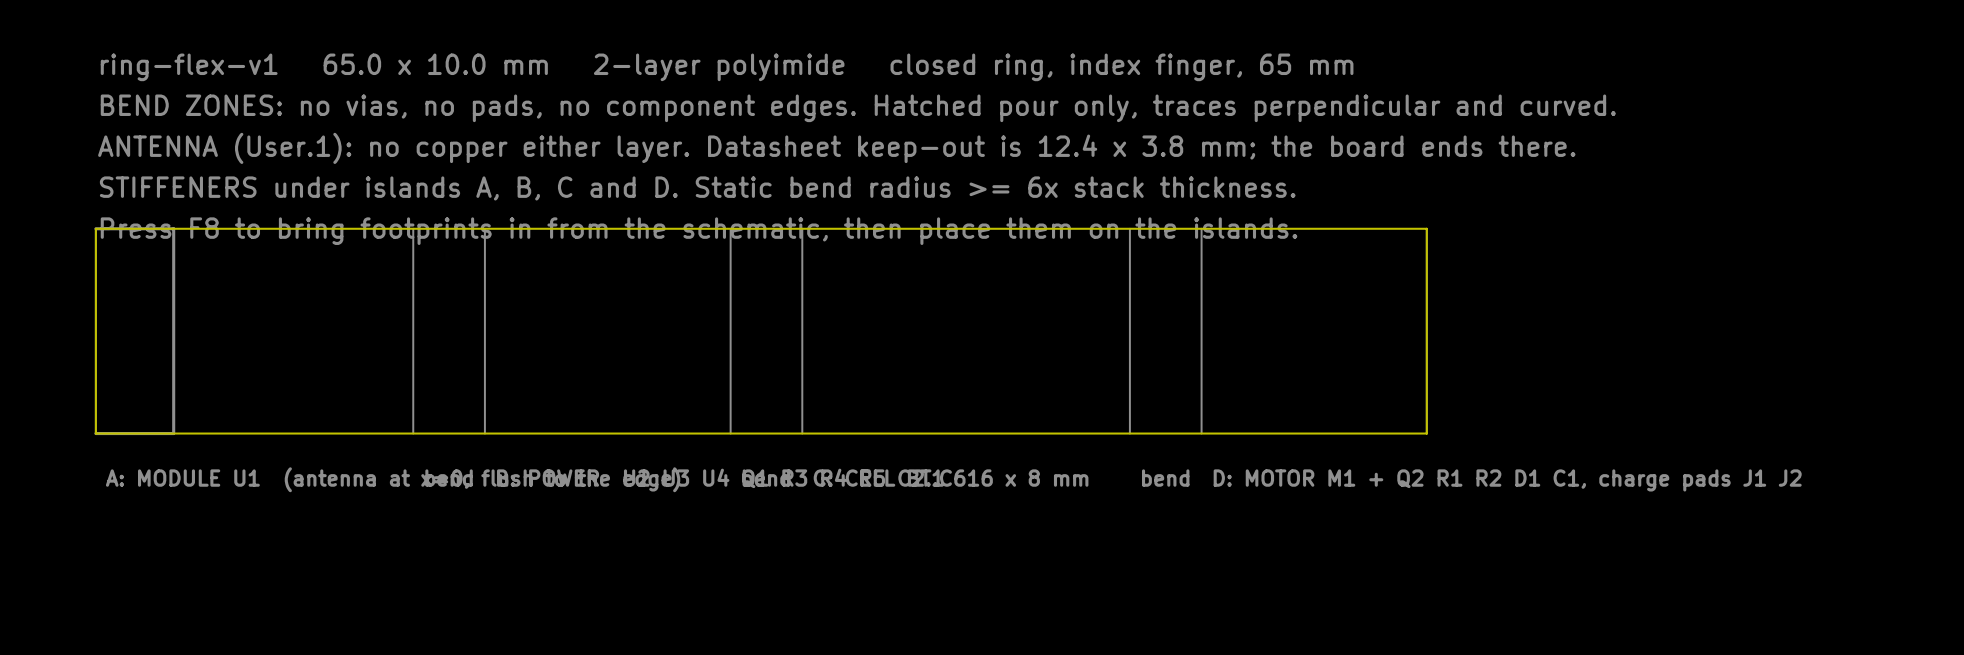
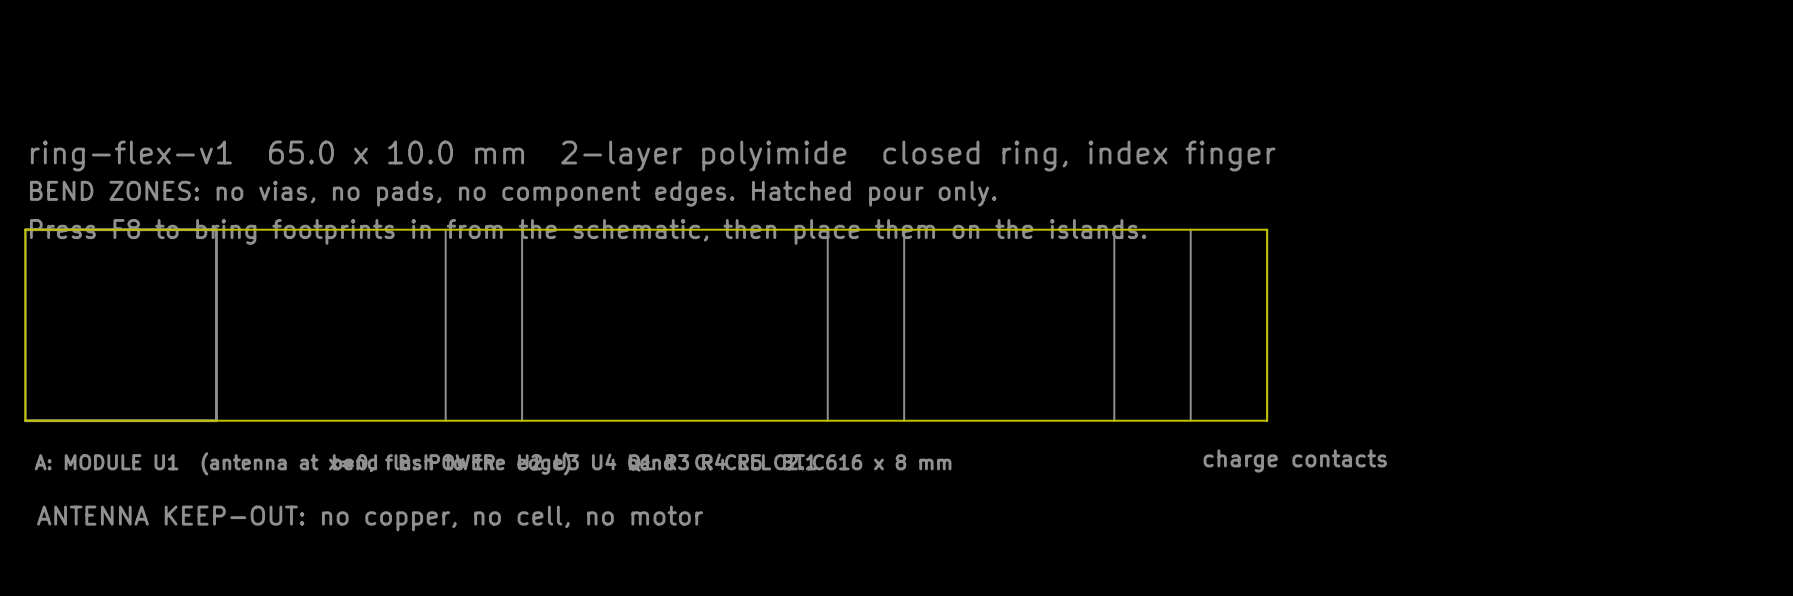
text: ring-flex-v1 65.0 x 10.0 mm 2-layer polyimide closed ring, index finger, 65 mm (727, 67) -> none
text: BEND ZONES: no vias, no pads, no component edges. Hatched pour only, traces perpendicular and curved. (858, 108) -> none
text: ANTENNA (User.1): no copper either layer. Datasheet keep-out is 12.4 x 3.8 mm; the board ends there. (836, 148) -> ring-flex-v1 65.0 x 10.0 mm 2-layer polyimide closed ring, index finger (653, 156)
text: STIFFENERS under islands A, B, C and D. Static bend radius >= 6x stack thickness. (697, 188) -> BEND ZONES: no vias, no pads, no component edges. Hatched pour only. (513, 193)
line: (173, 228) (173, 433) -> (98, 229) (216, 229) (216, 420) (98, 420)
line: (413, 228) (413, 433) -> none
line: (484, 228) (484, 433) -> (445, 229) (445, 420)
line: (730, 228) (730, 433) -> (904, 229) (904, 420)
line: (802, 228) (802, 433) -> (522, 229) (522, 420)
line: (1129, 228) (1129, 433) -> (827, 229) (827, 420)
line: (1201, 228) (1201, 433) -> (1114, 229) (1114, 420)
line: none -> (1190, 229) (1190, 420)
text: none -> charge contacts (1295, 460)
text: bend (1165, 478) -> none
text: D: MOTOR M1 + Q2 R1 R2 D1 C1, charge pads J1 J2 (1507, 480) -> none
text: none -> ANTENNA KEEP-OUT: no copper, no cell, no motor (370, 518)

